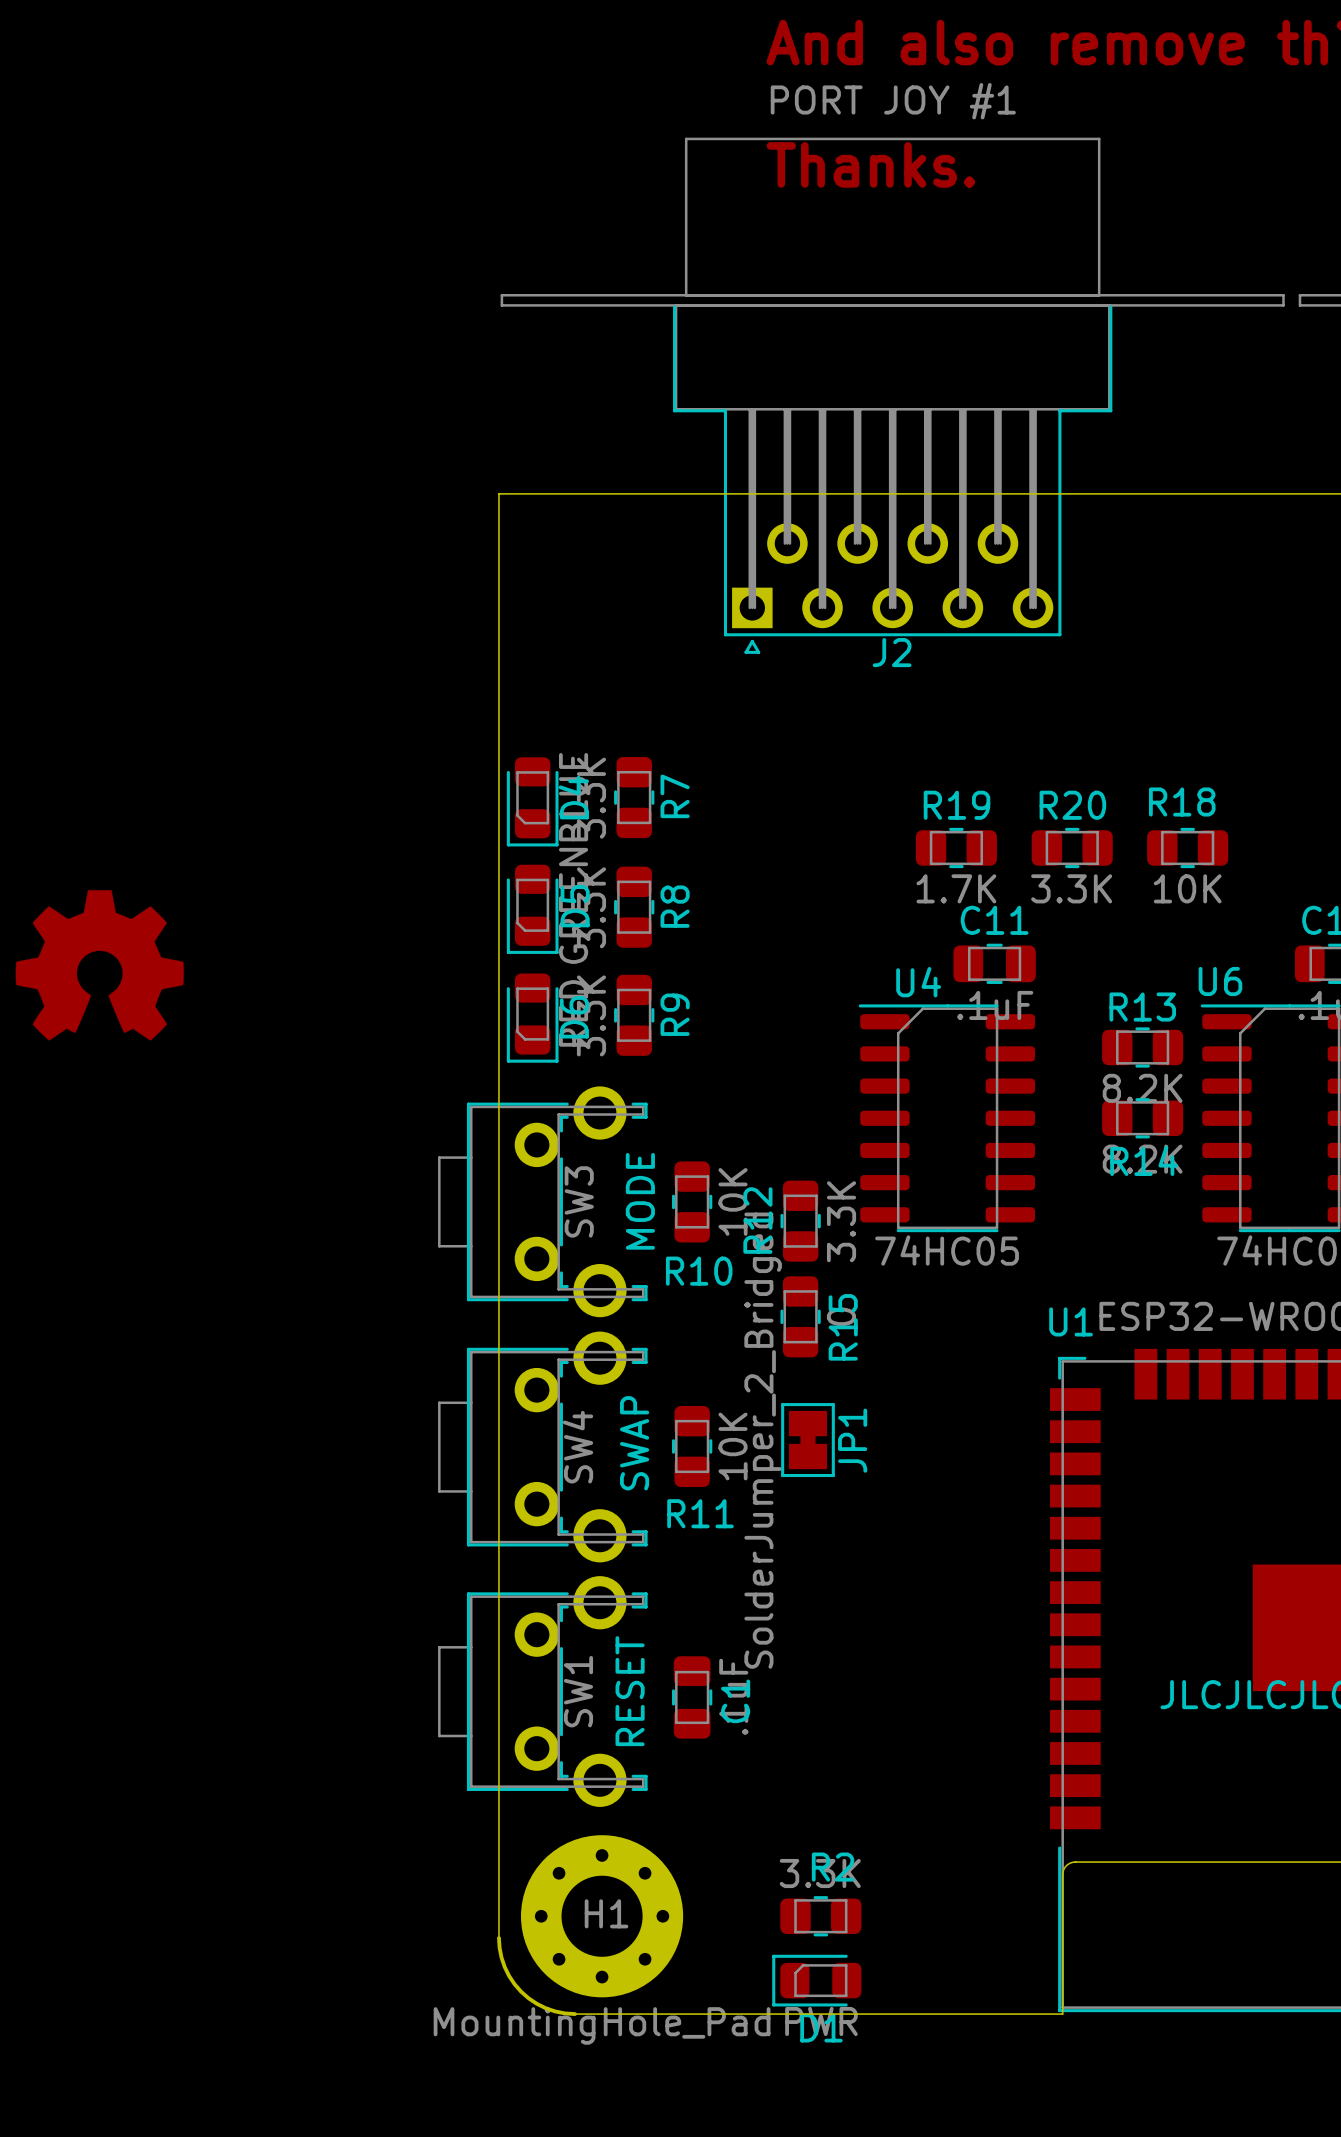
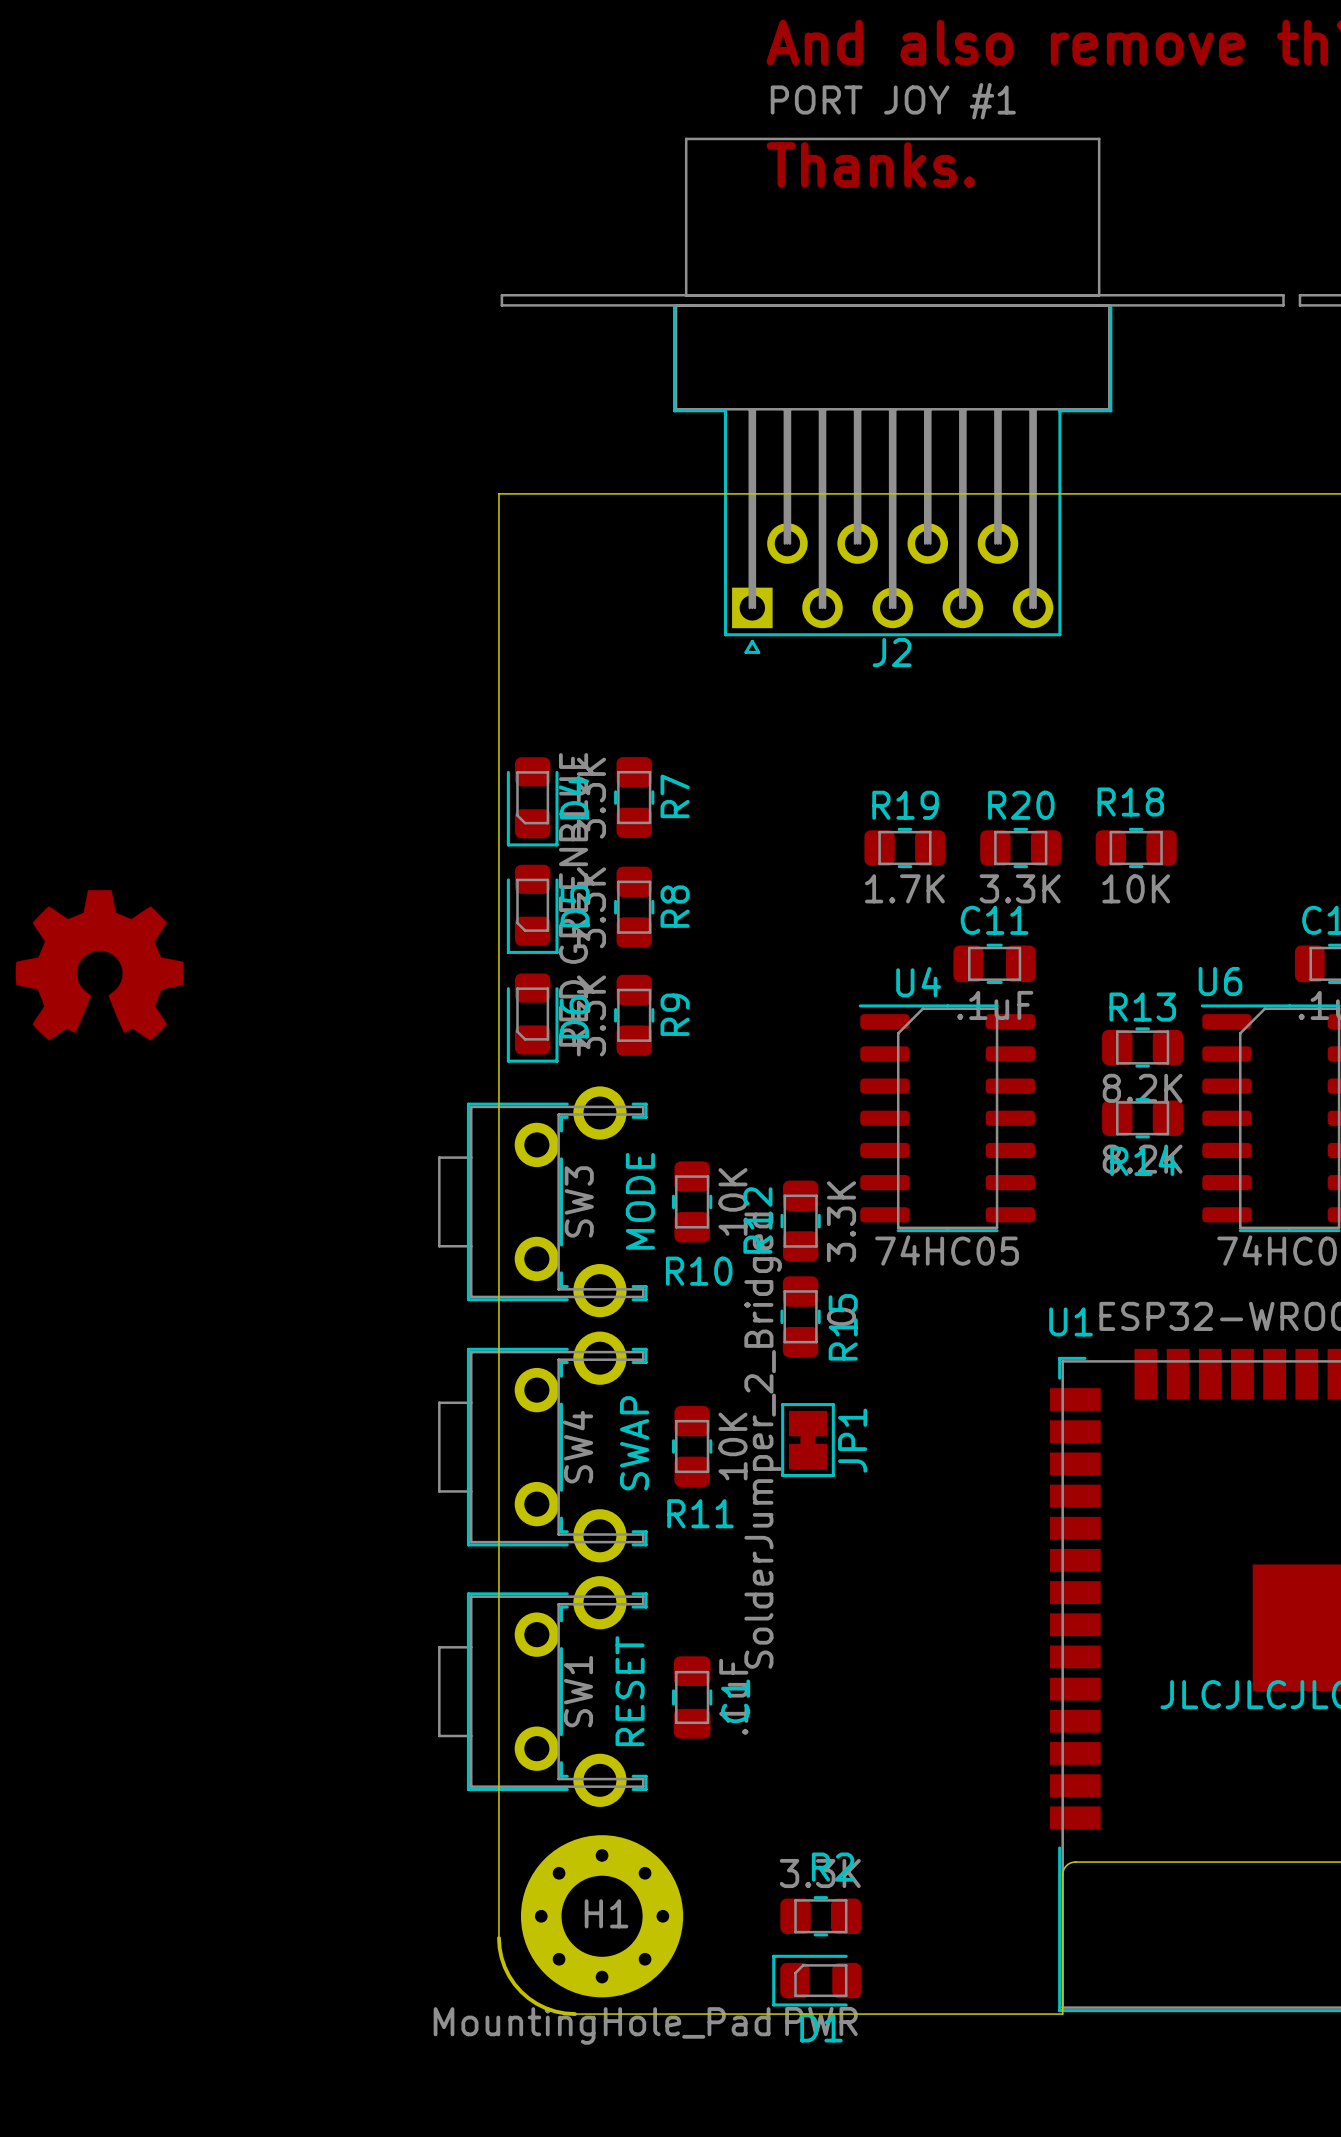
R19 position: (956, 847) -> (904, 847)
R20 position: (1072, 847) -> (1020, 847)
R18 position: (1187, 847) -> (1136, 847)

